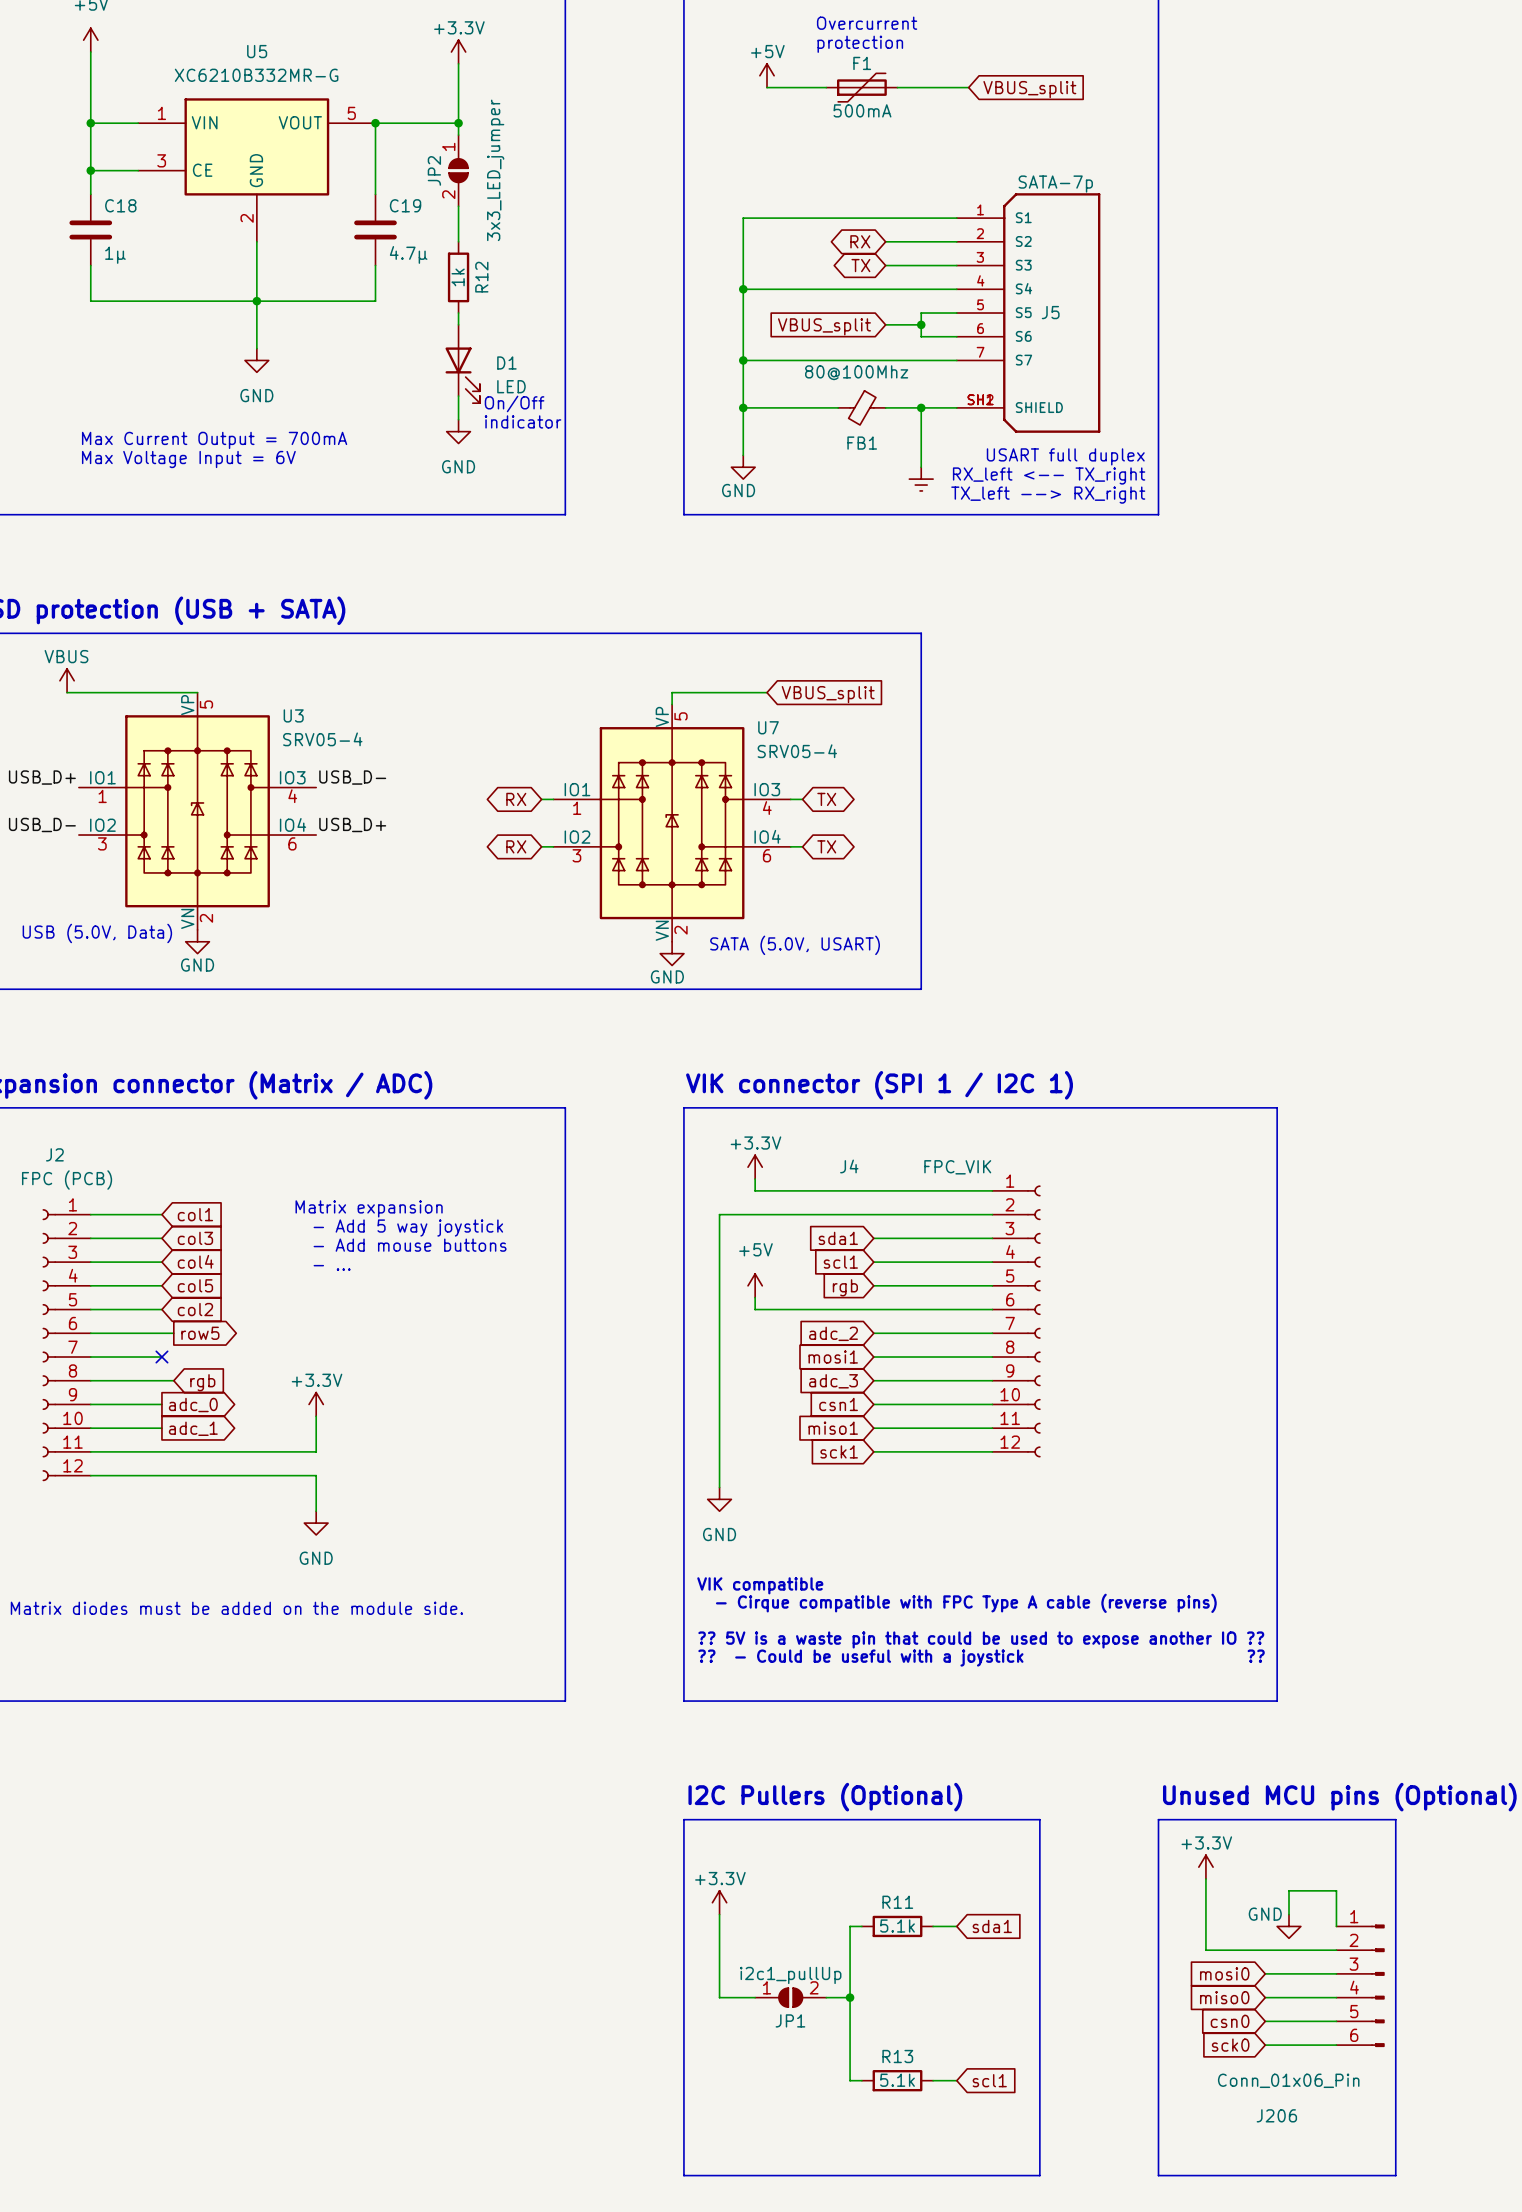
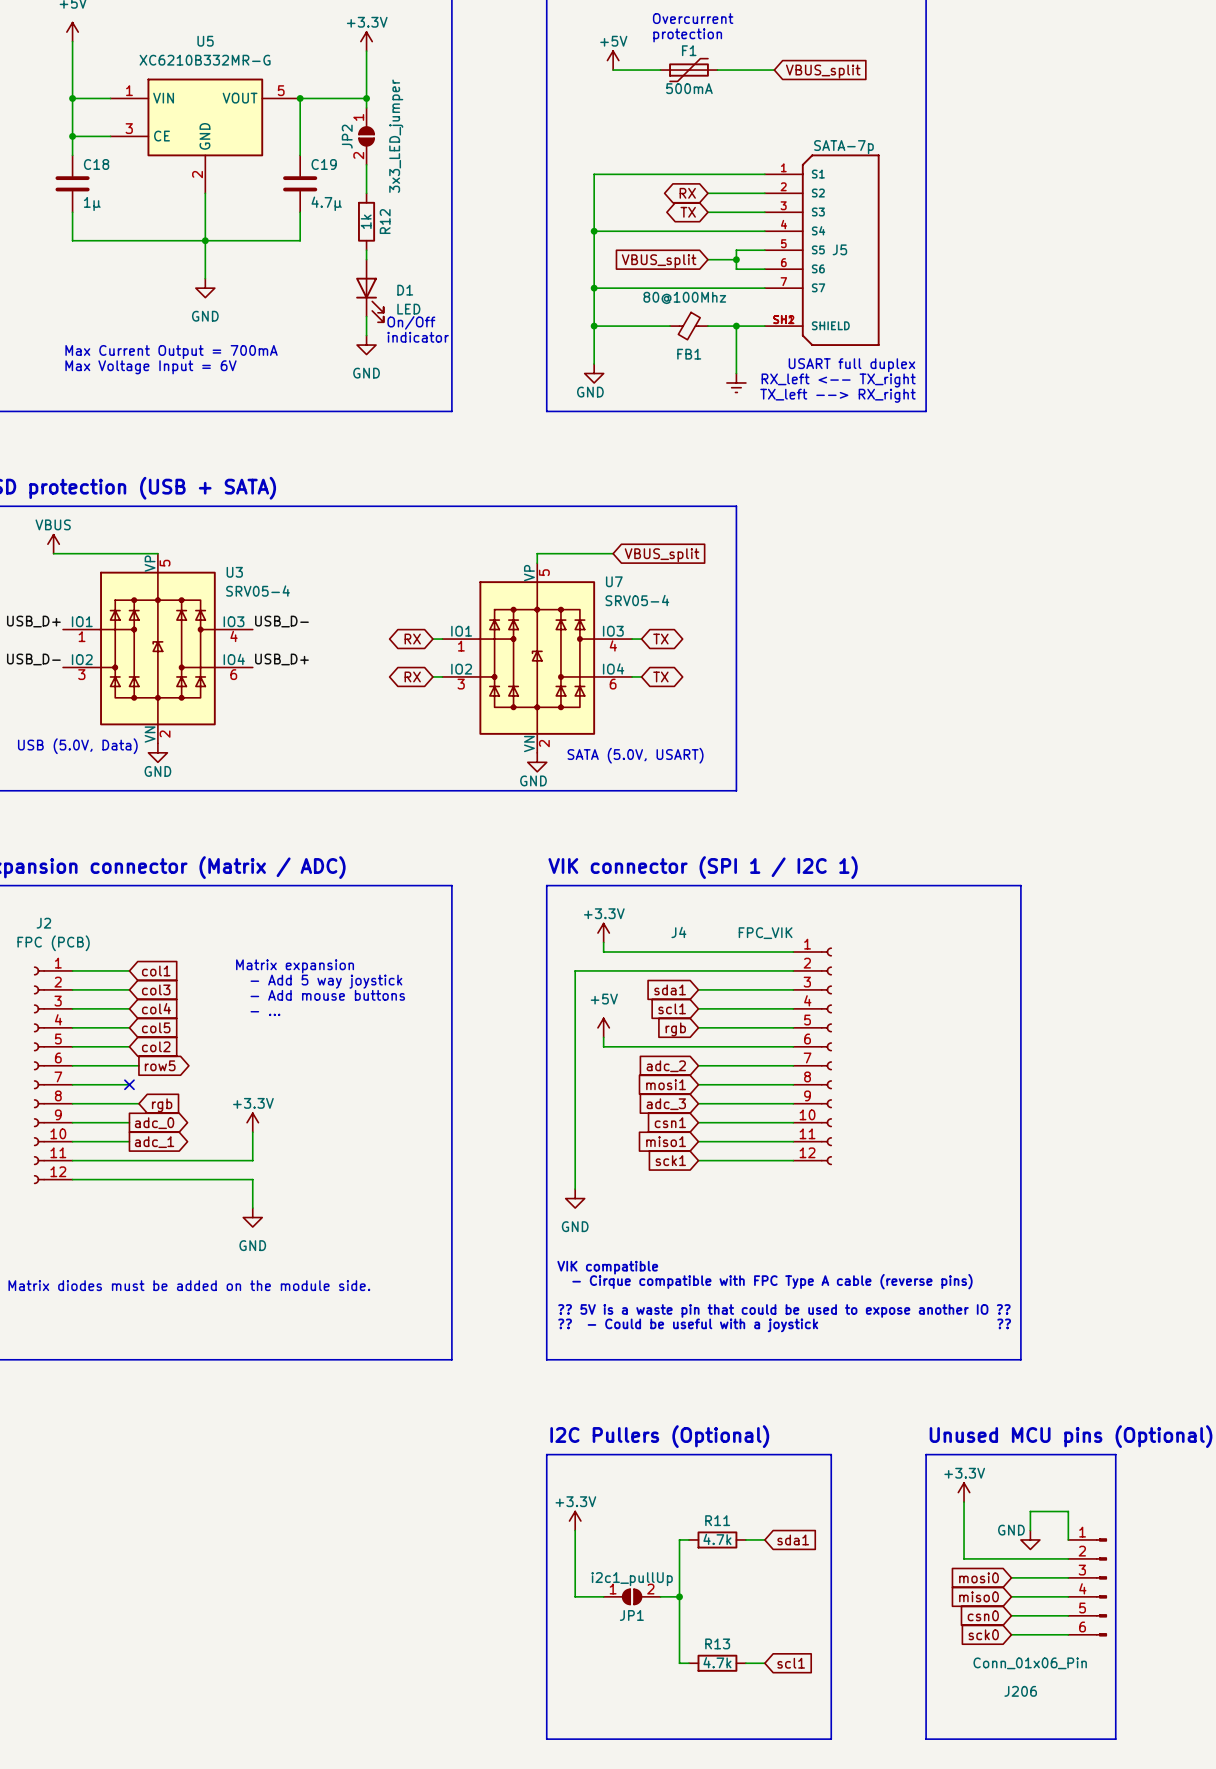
R11 value: 5.1k (897, 1926) -> 4.7k (717, 1539)
R13 value: 5.1k (897, 2080) -> 4.7k (717, 1662)

